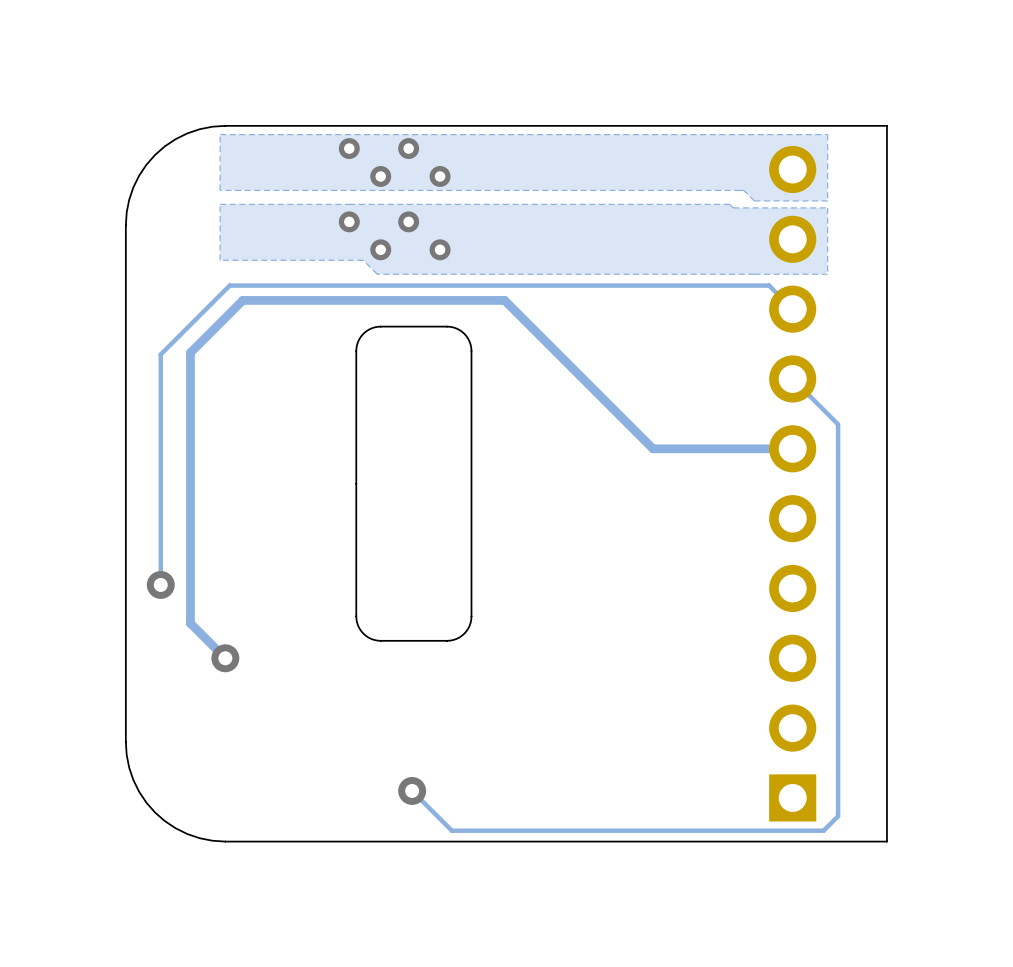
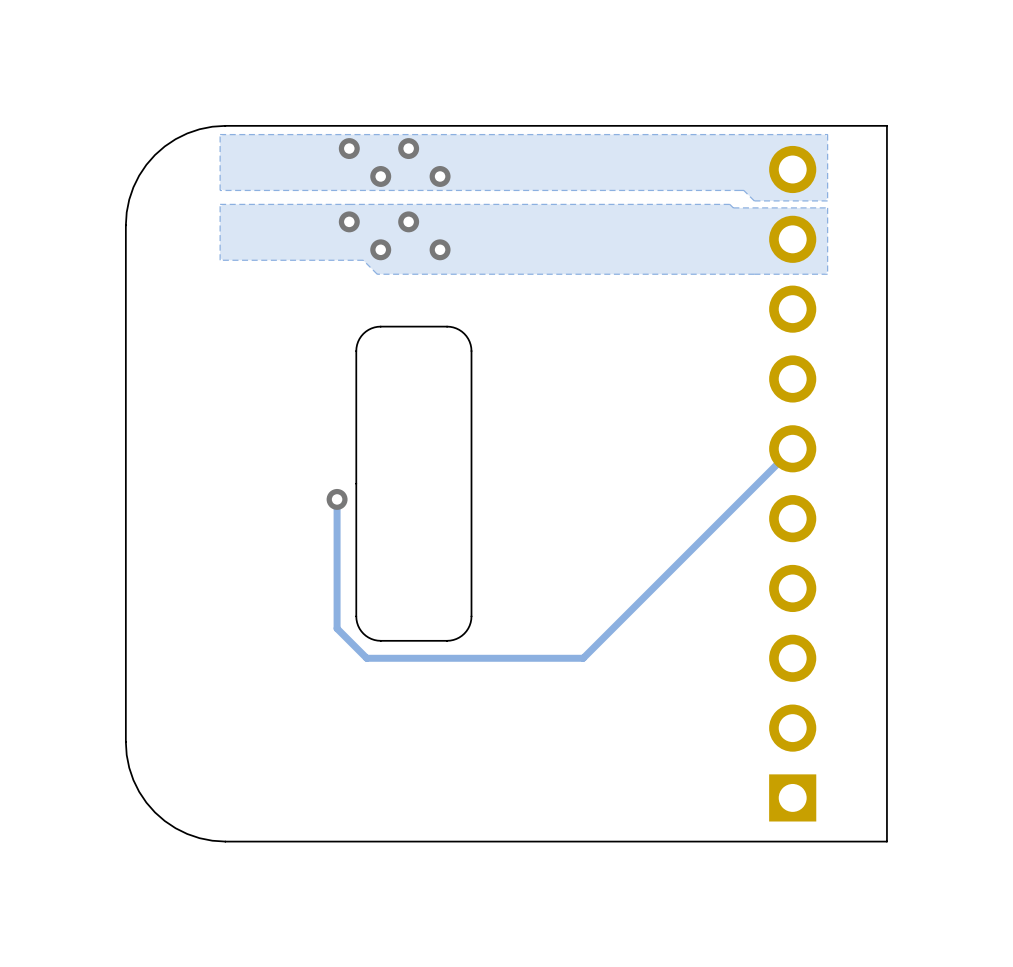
track: (792, 309) (769, 285) (229, 285) (160, 354) (160, 584) -> none
track: (792, 378) (838, 424) (838, 816) (823, 830) (451, 830) (412, 790) -> none
track: (792, 448) (653, 448) (504, 300) (242, 300) (190, 352) (190, 623) (225, 658) -> (792, 448) (583, 658) (366, 658) (337, 628) (337, 499)
via: none -> (337, 499)
via: (160, 584) -> none
via: (225, 658) -> none
via: (412, 790) -> none

